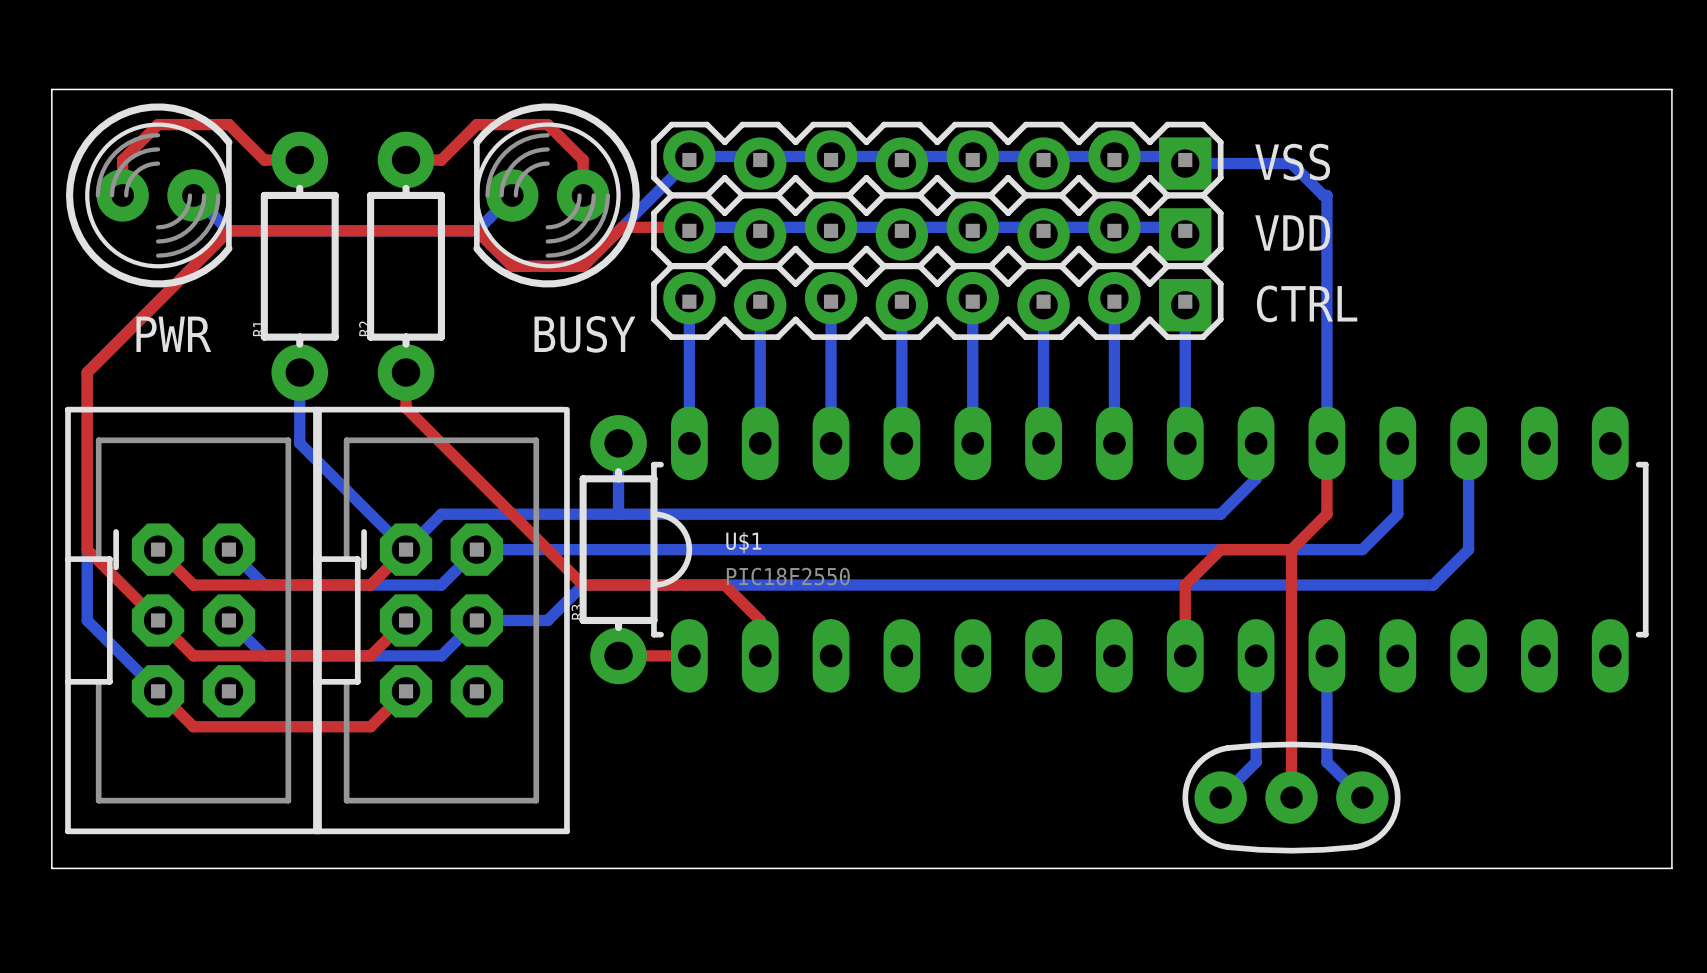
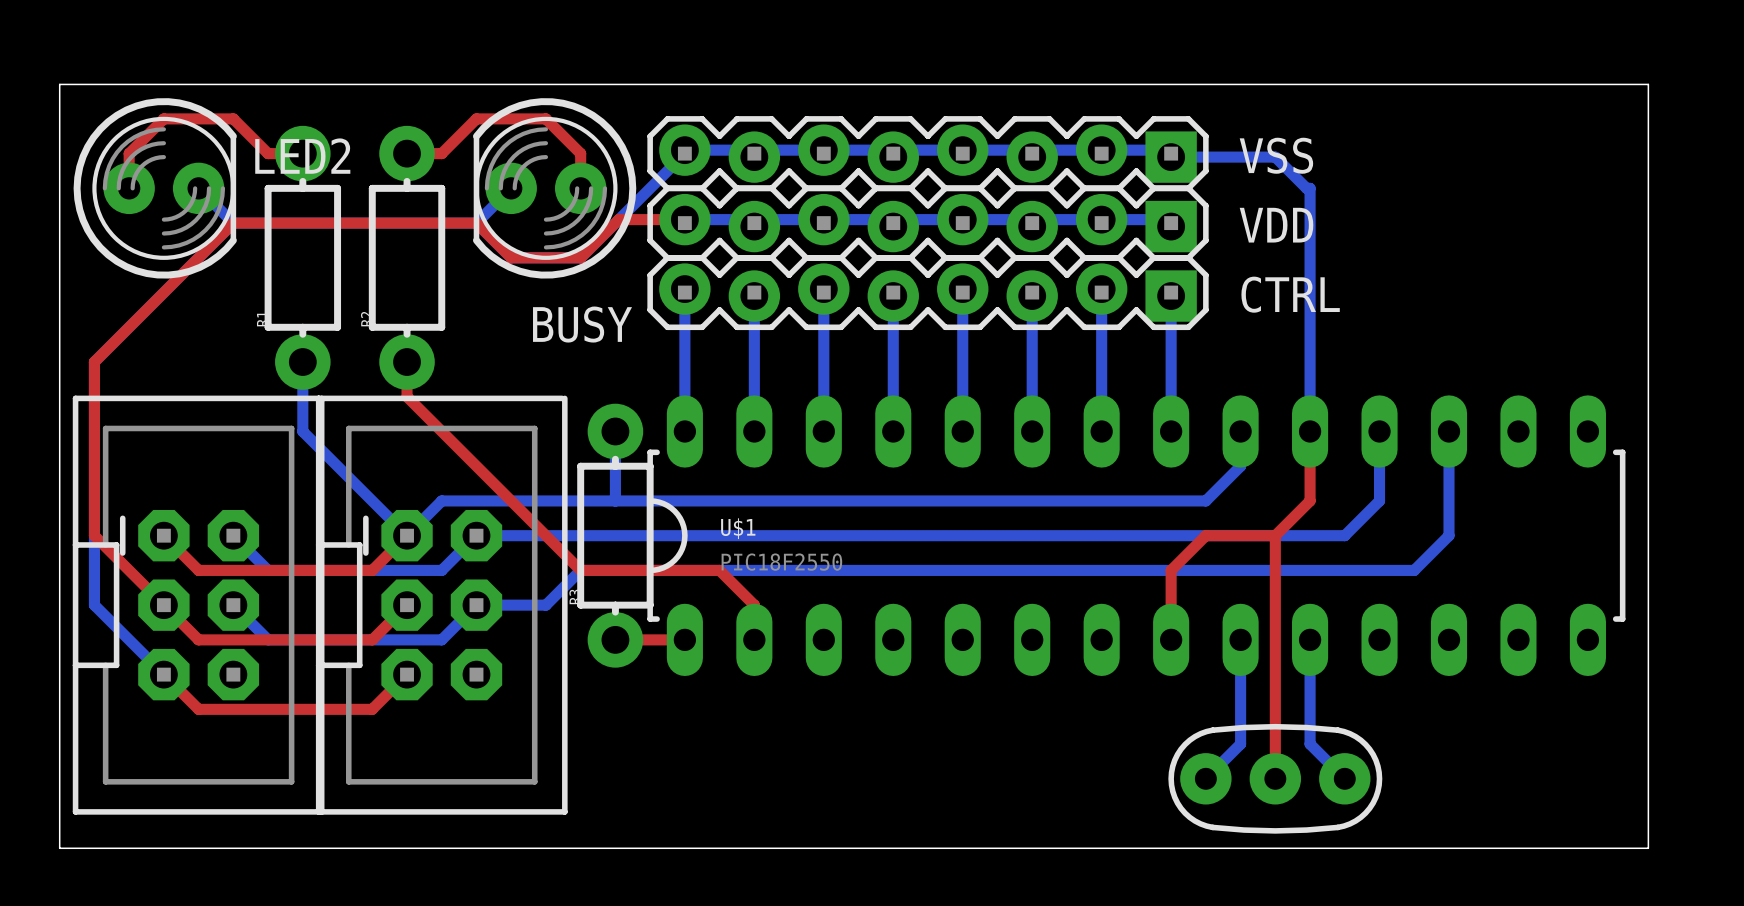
PWR name: PWR (173, 334) -> LED2 (302, 156)

